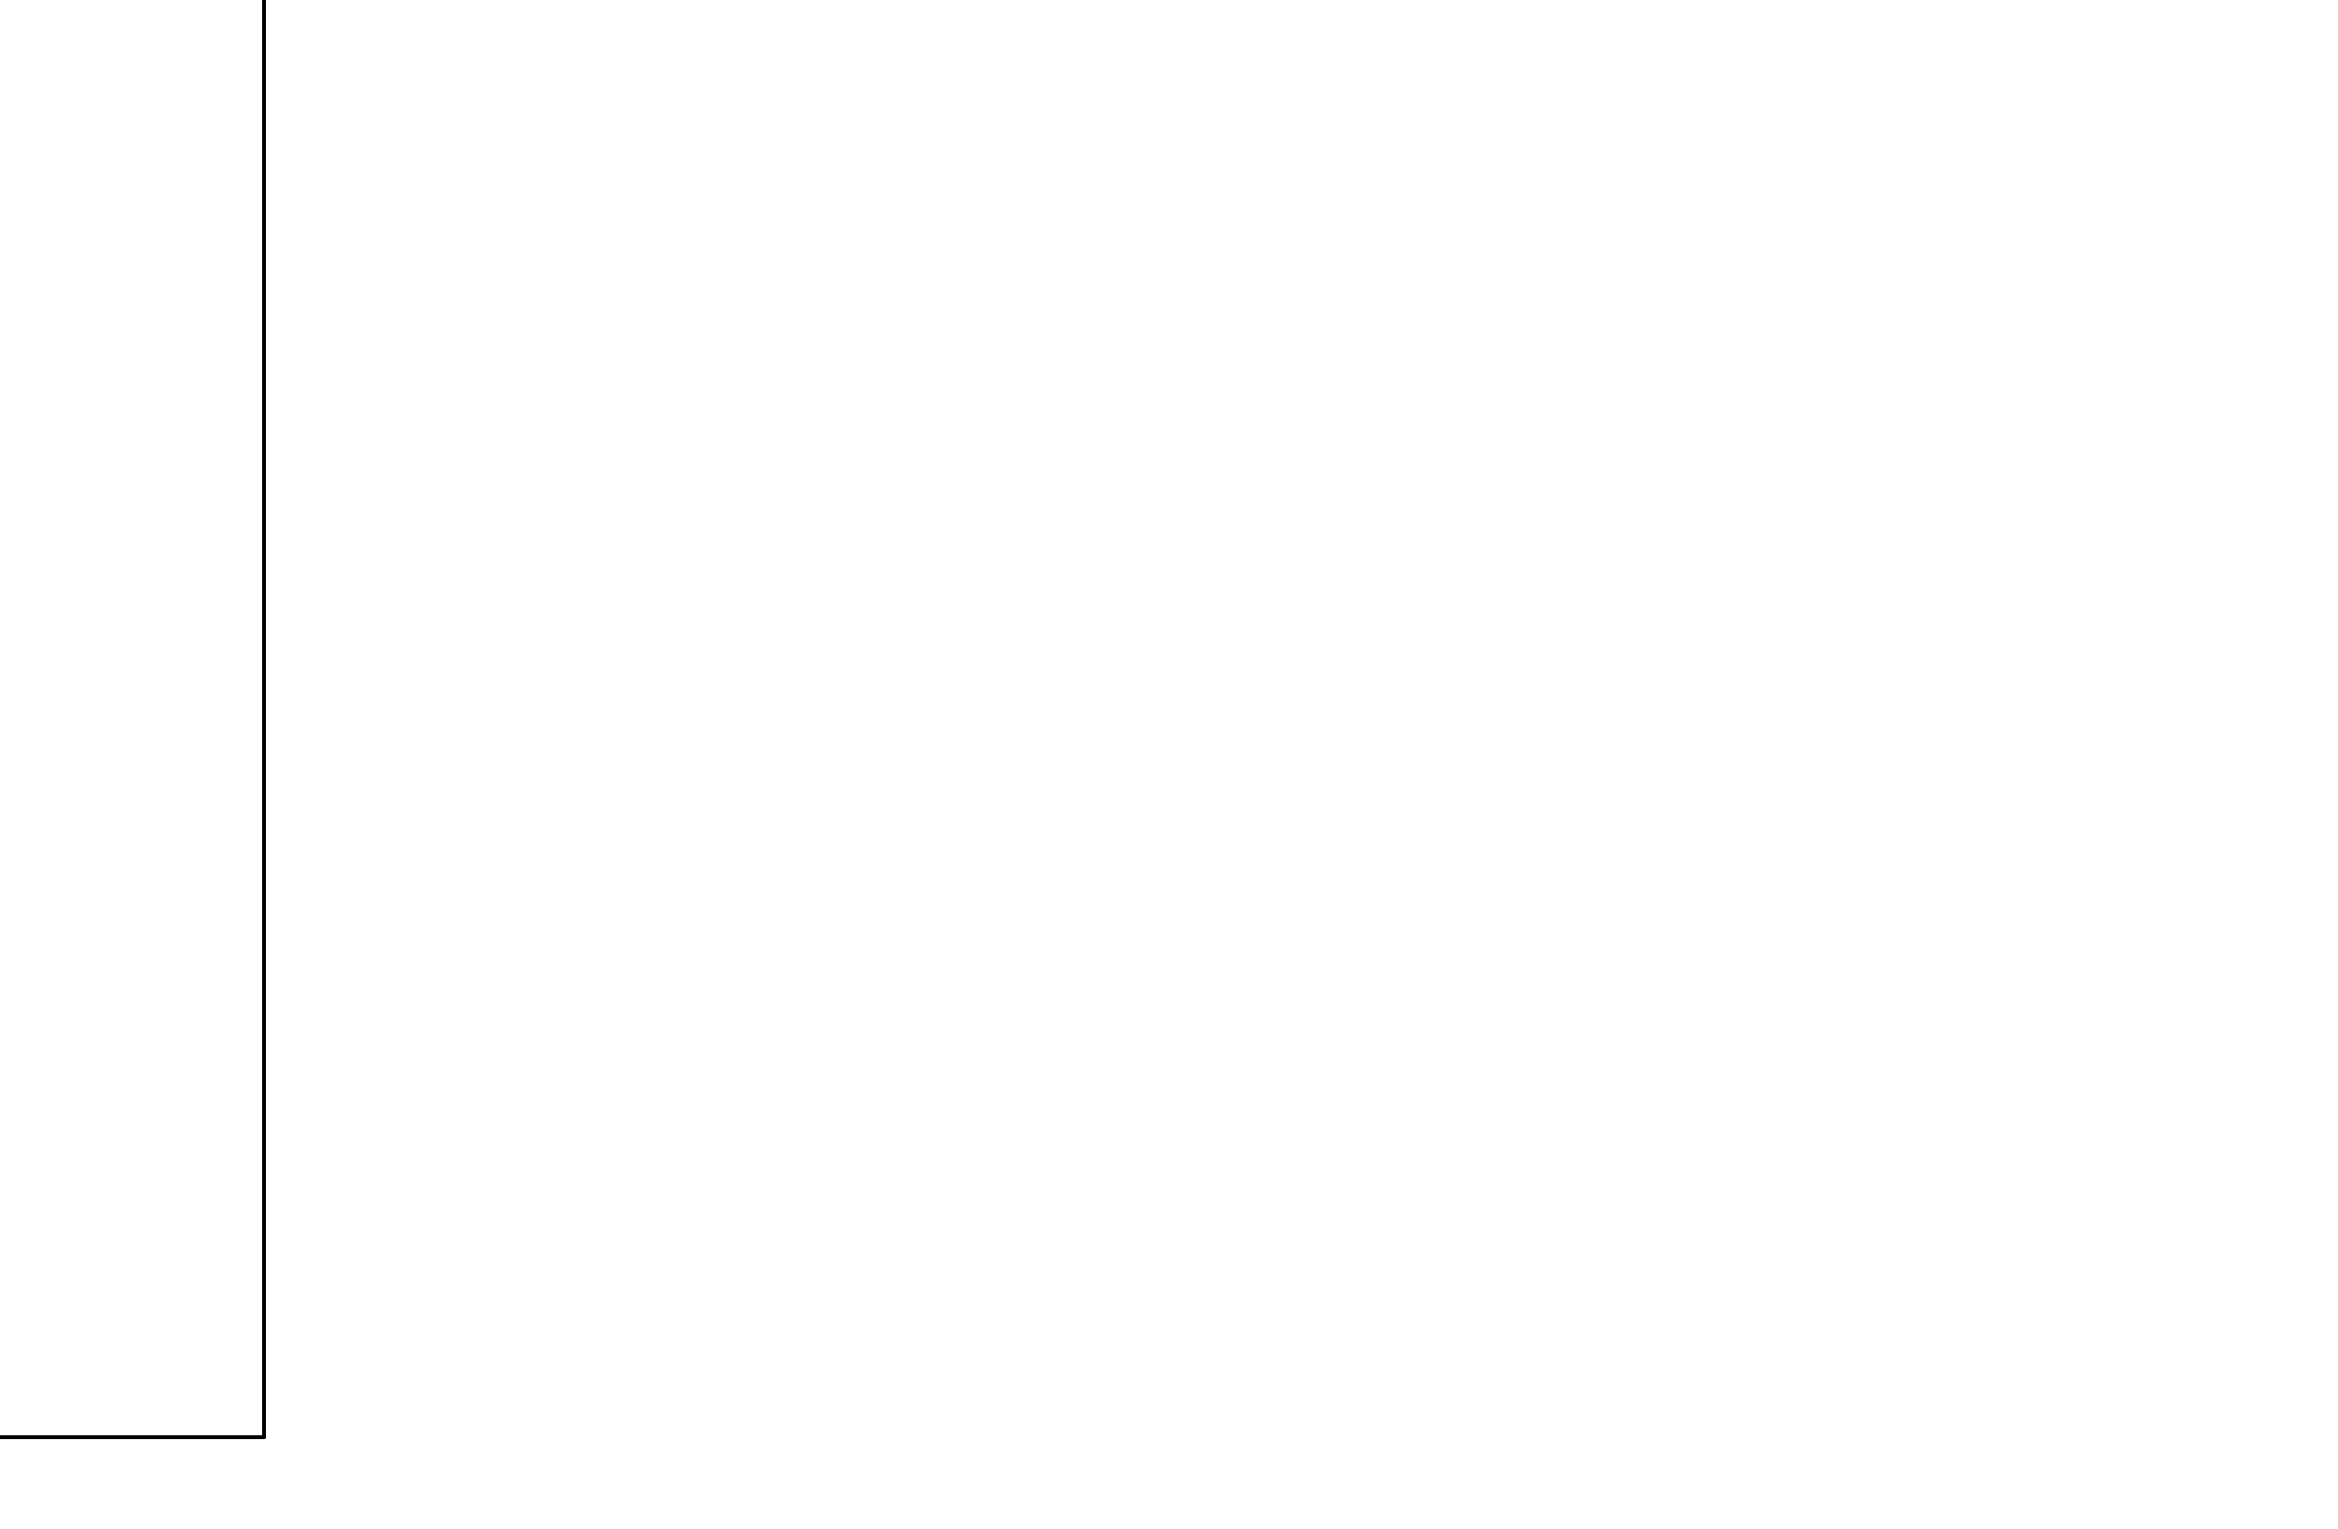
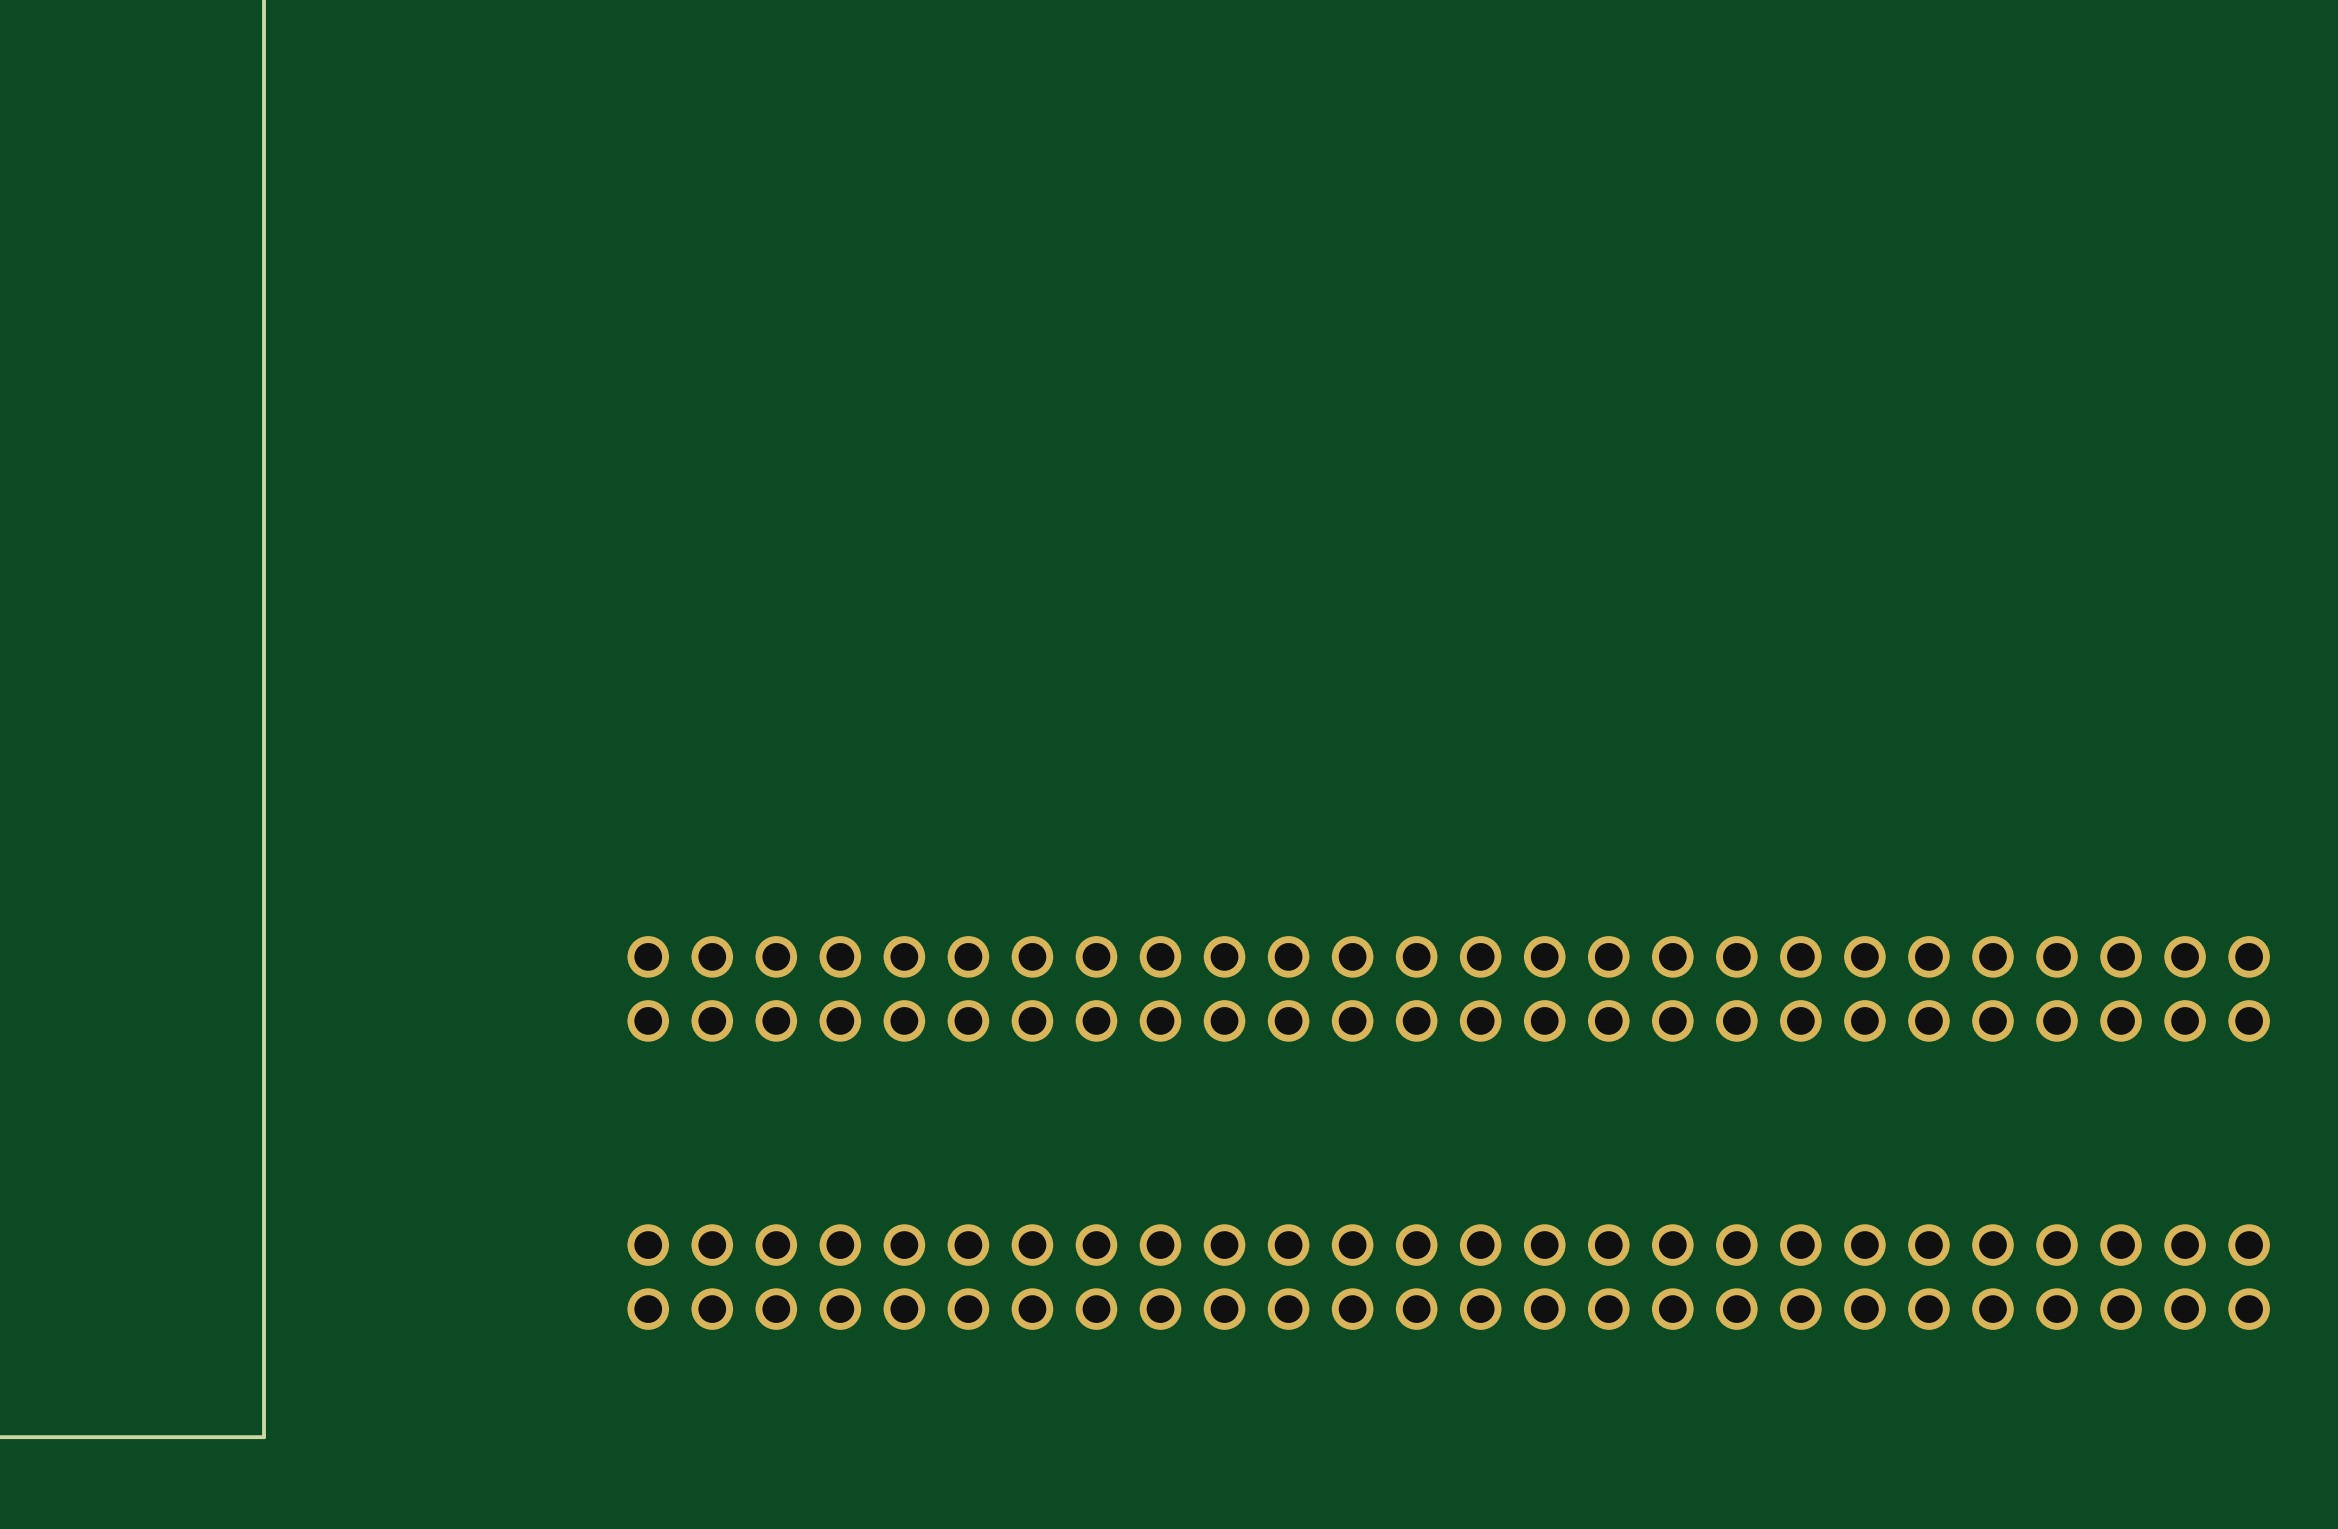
part: none -> (1448, 988)
part: none -> (1448, 1277)

